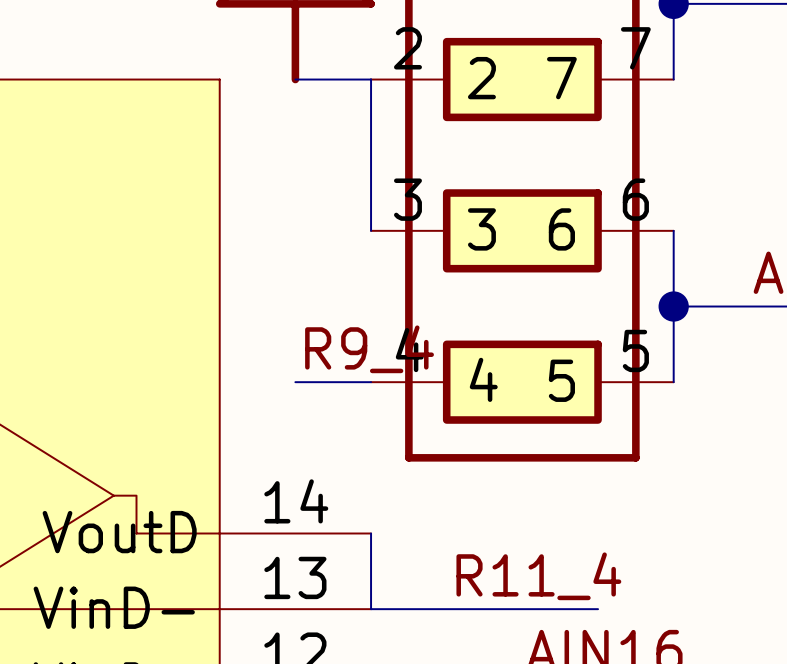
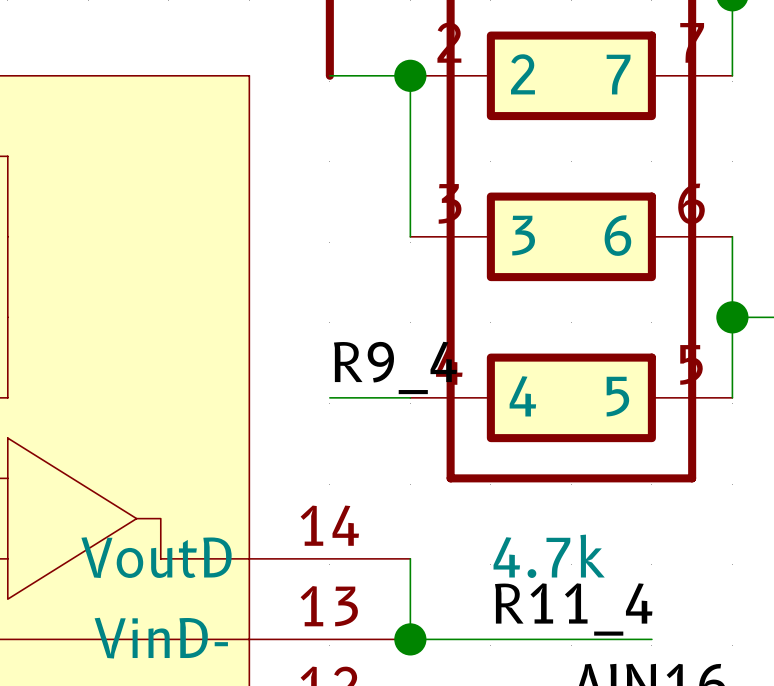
junction: none -> (410, 75)
part value: none -> 4.7k (549, 556)
junction: none -> (410, 639)

